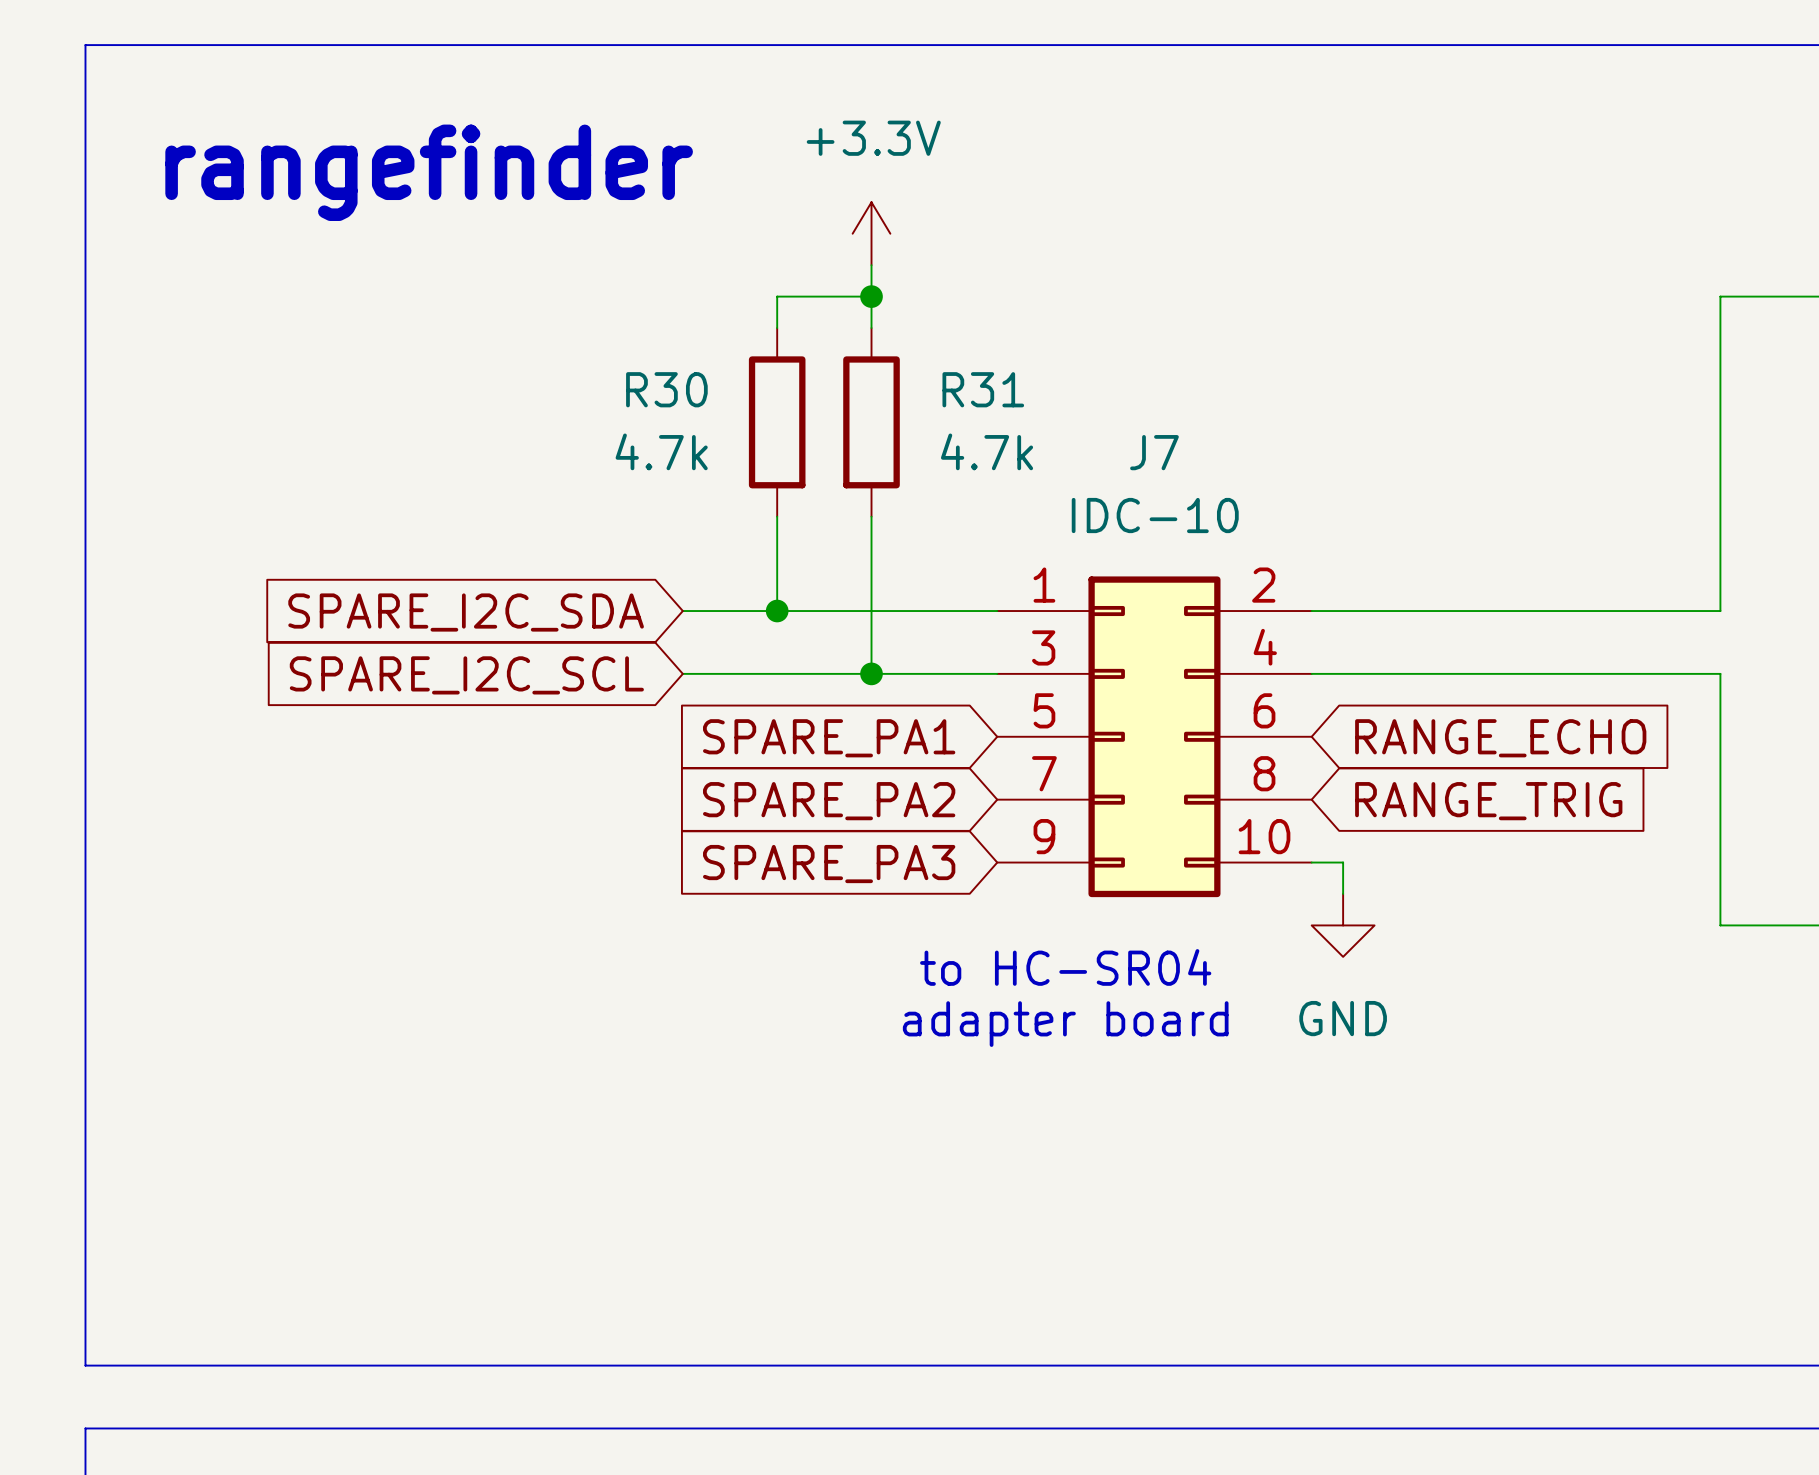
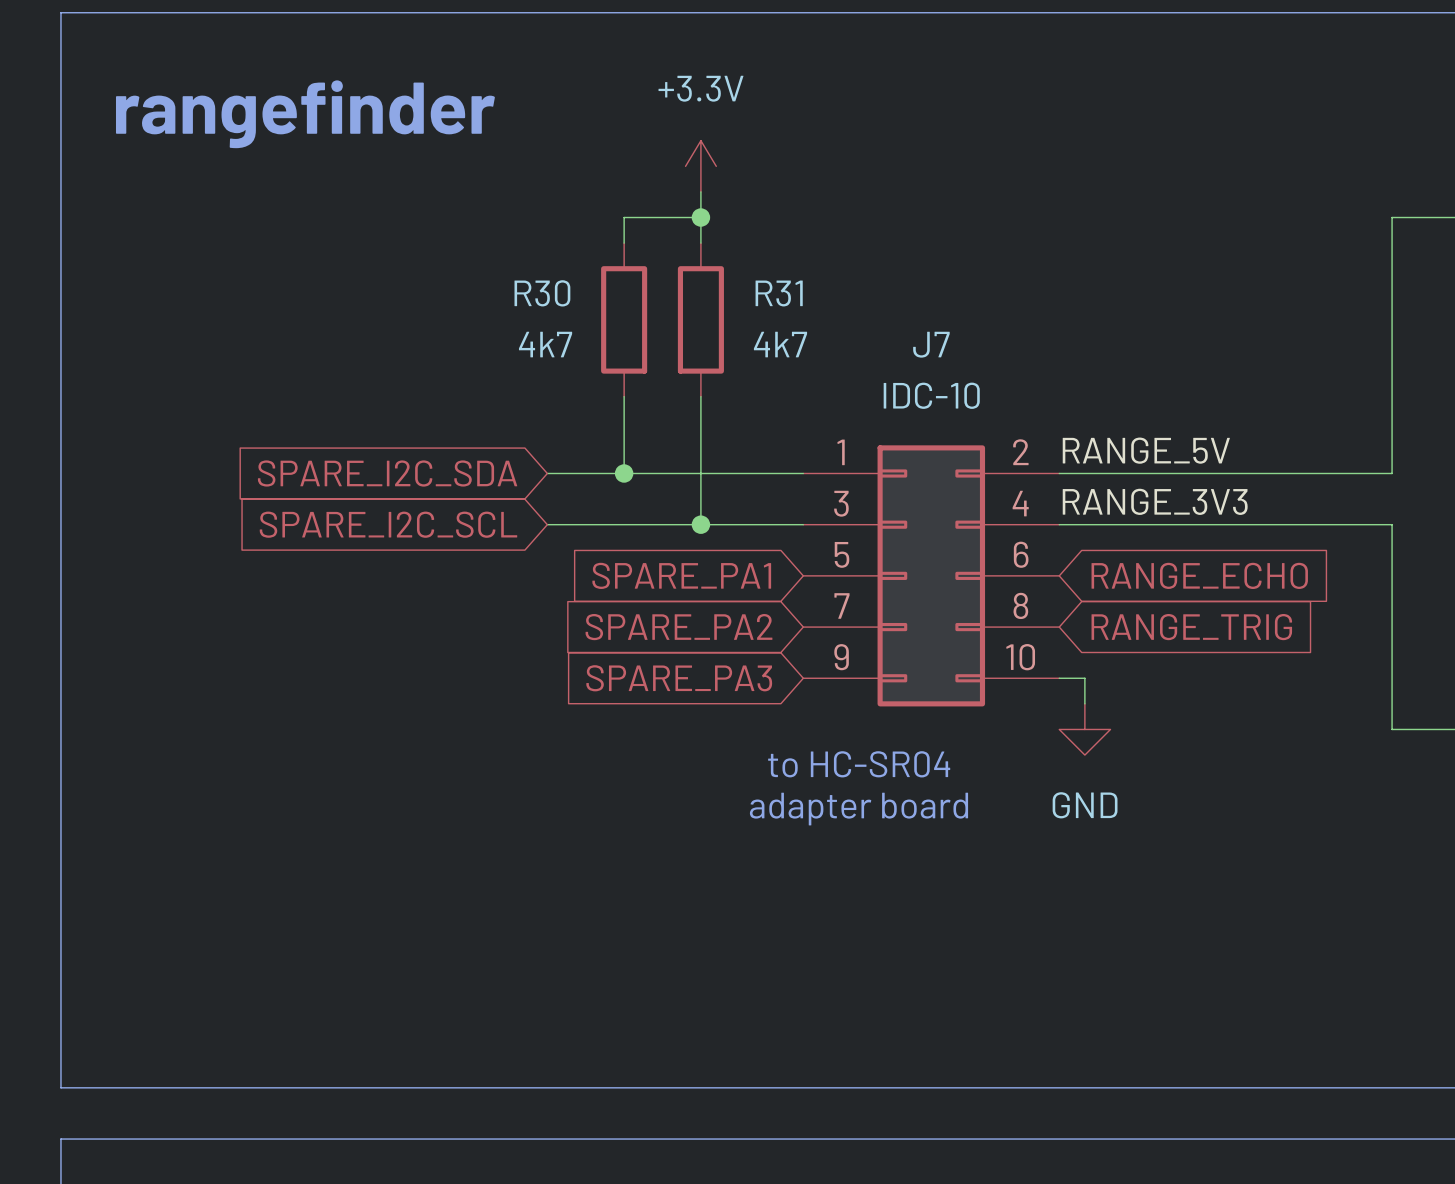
R30 value: 4.7k (661, 451) -> 4k7 (545, 344)
R31 value: 4.7k (987, 451) -> 4k7 (780, 344)
label: none -> RANGE_5V (1146, 450)
label: none -> RANGE_3V3 (1155, 501)

